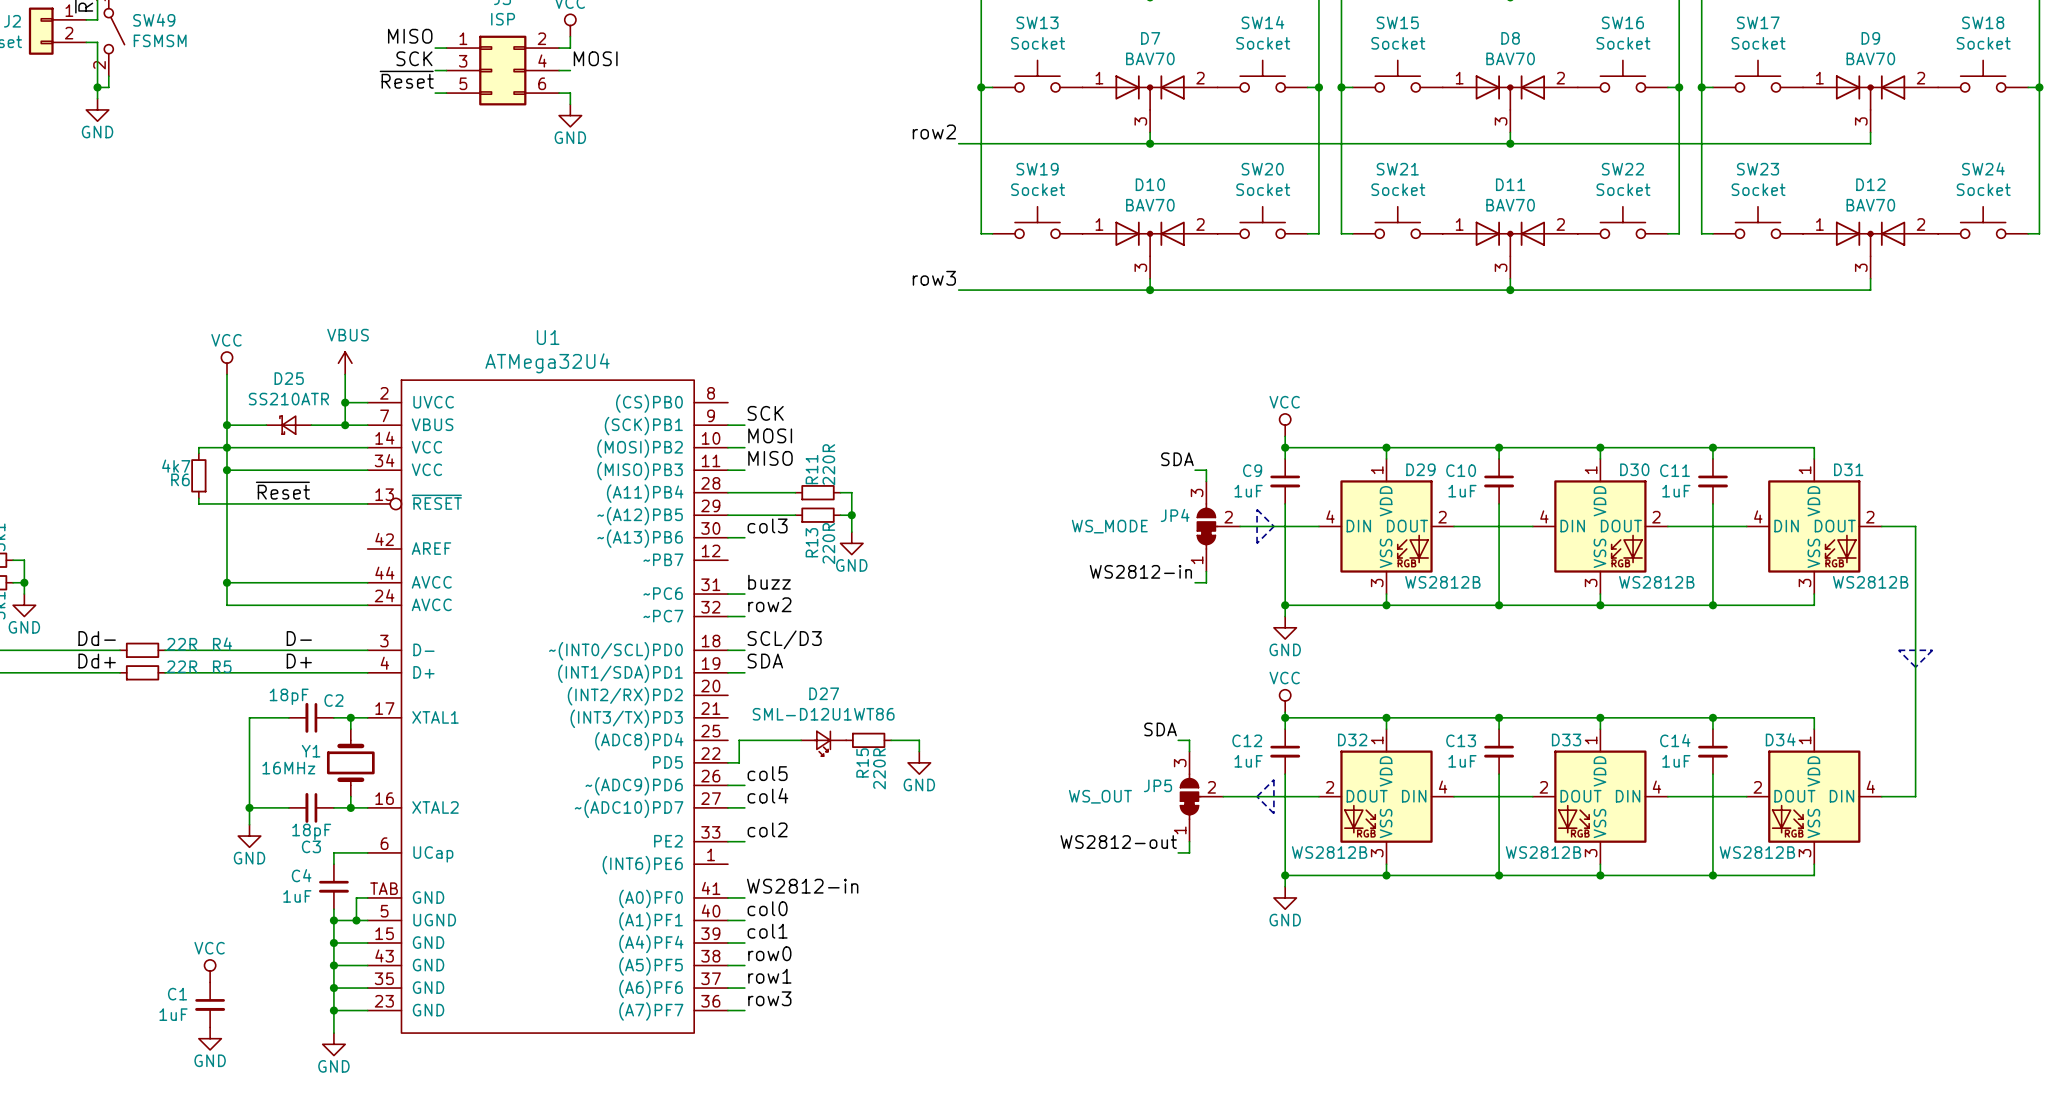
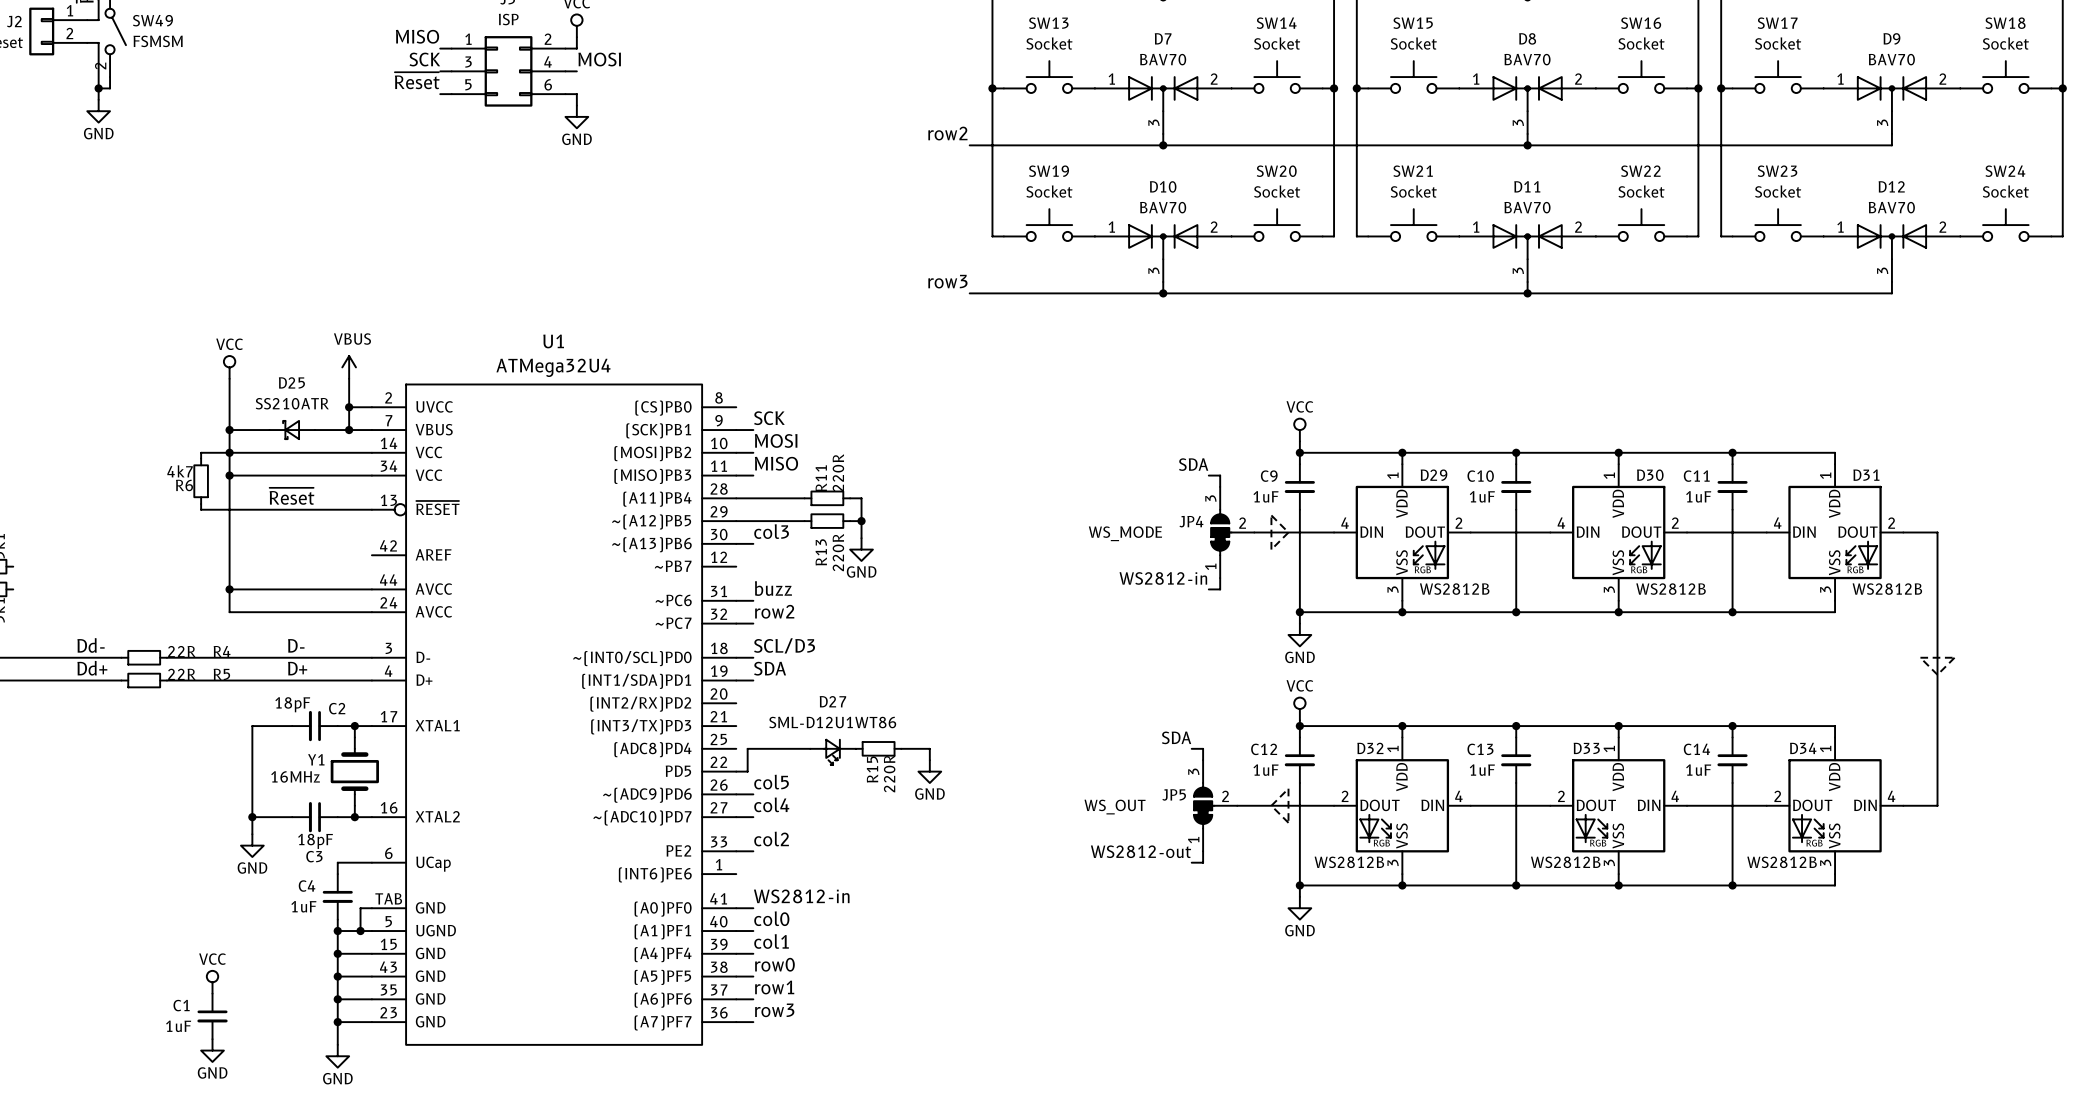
wire: (13, 560) (24, 560) (24, 594) -> none
wire: (13, 582) (24, 582) -> none
junction: (24, 582) -> none
power symbol: GND (24, 605) -> none

